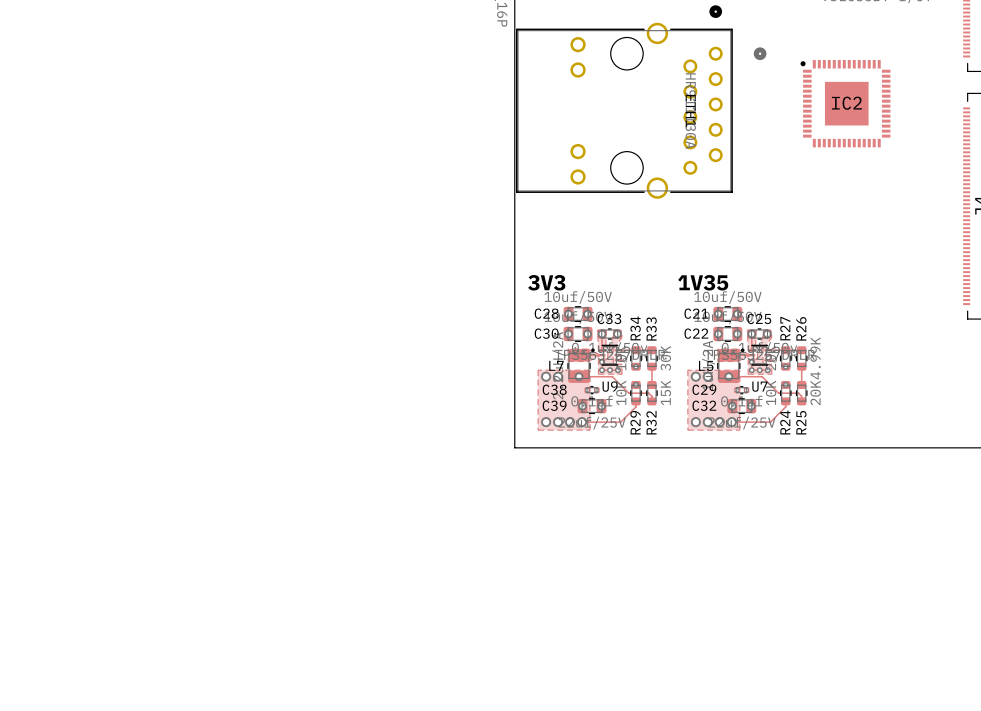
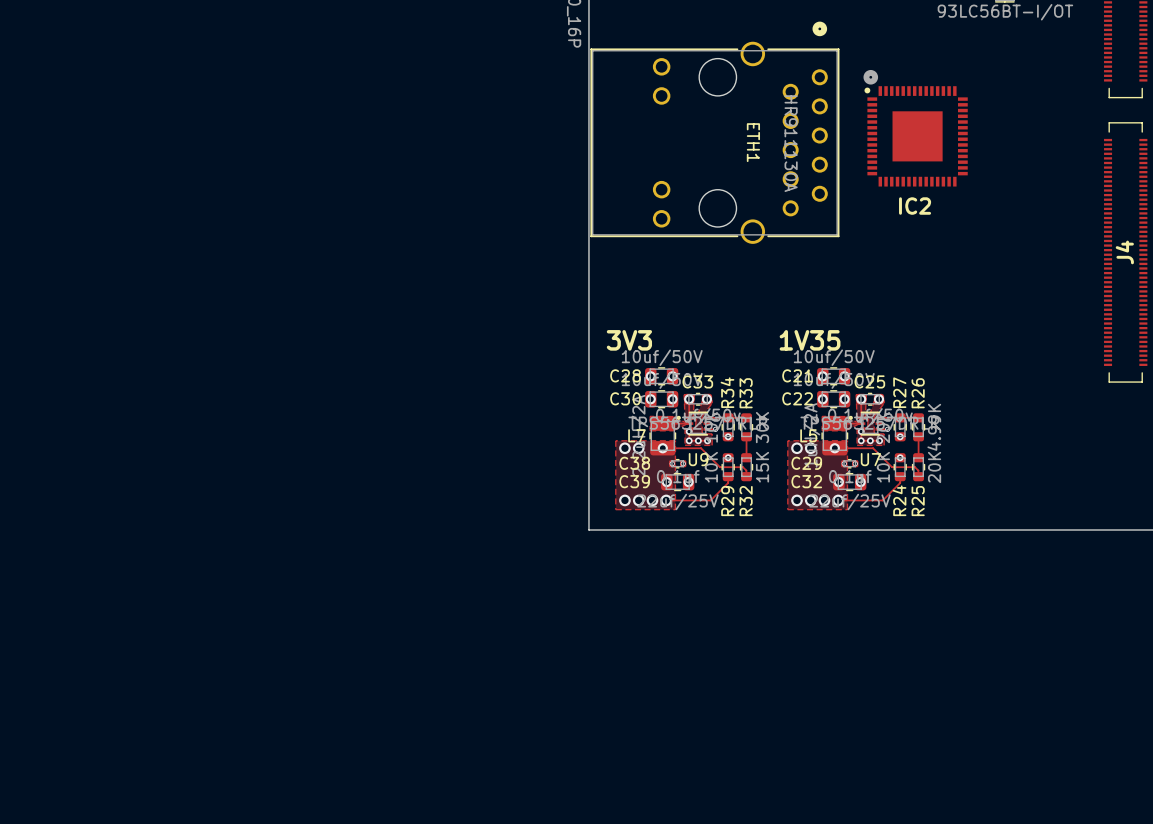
IC2 position: (845, 103) -> (916, 136)
IC2 name position: IC2 (846, 103) -> IC2 (915, 206)
ETH1 name position: ETH1 (690, 111) -> ETH1 (753, 142)

